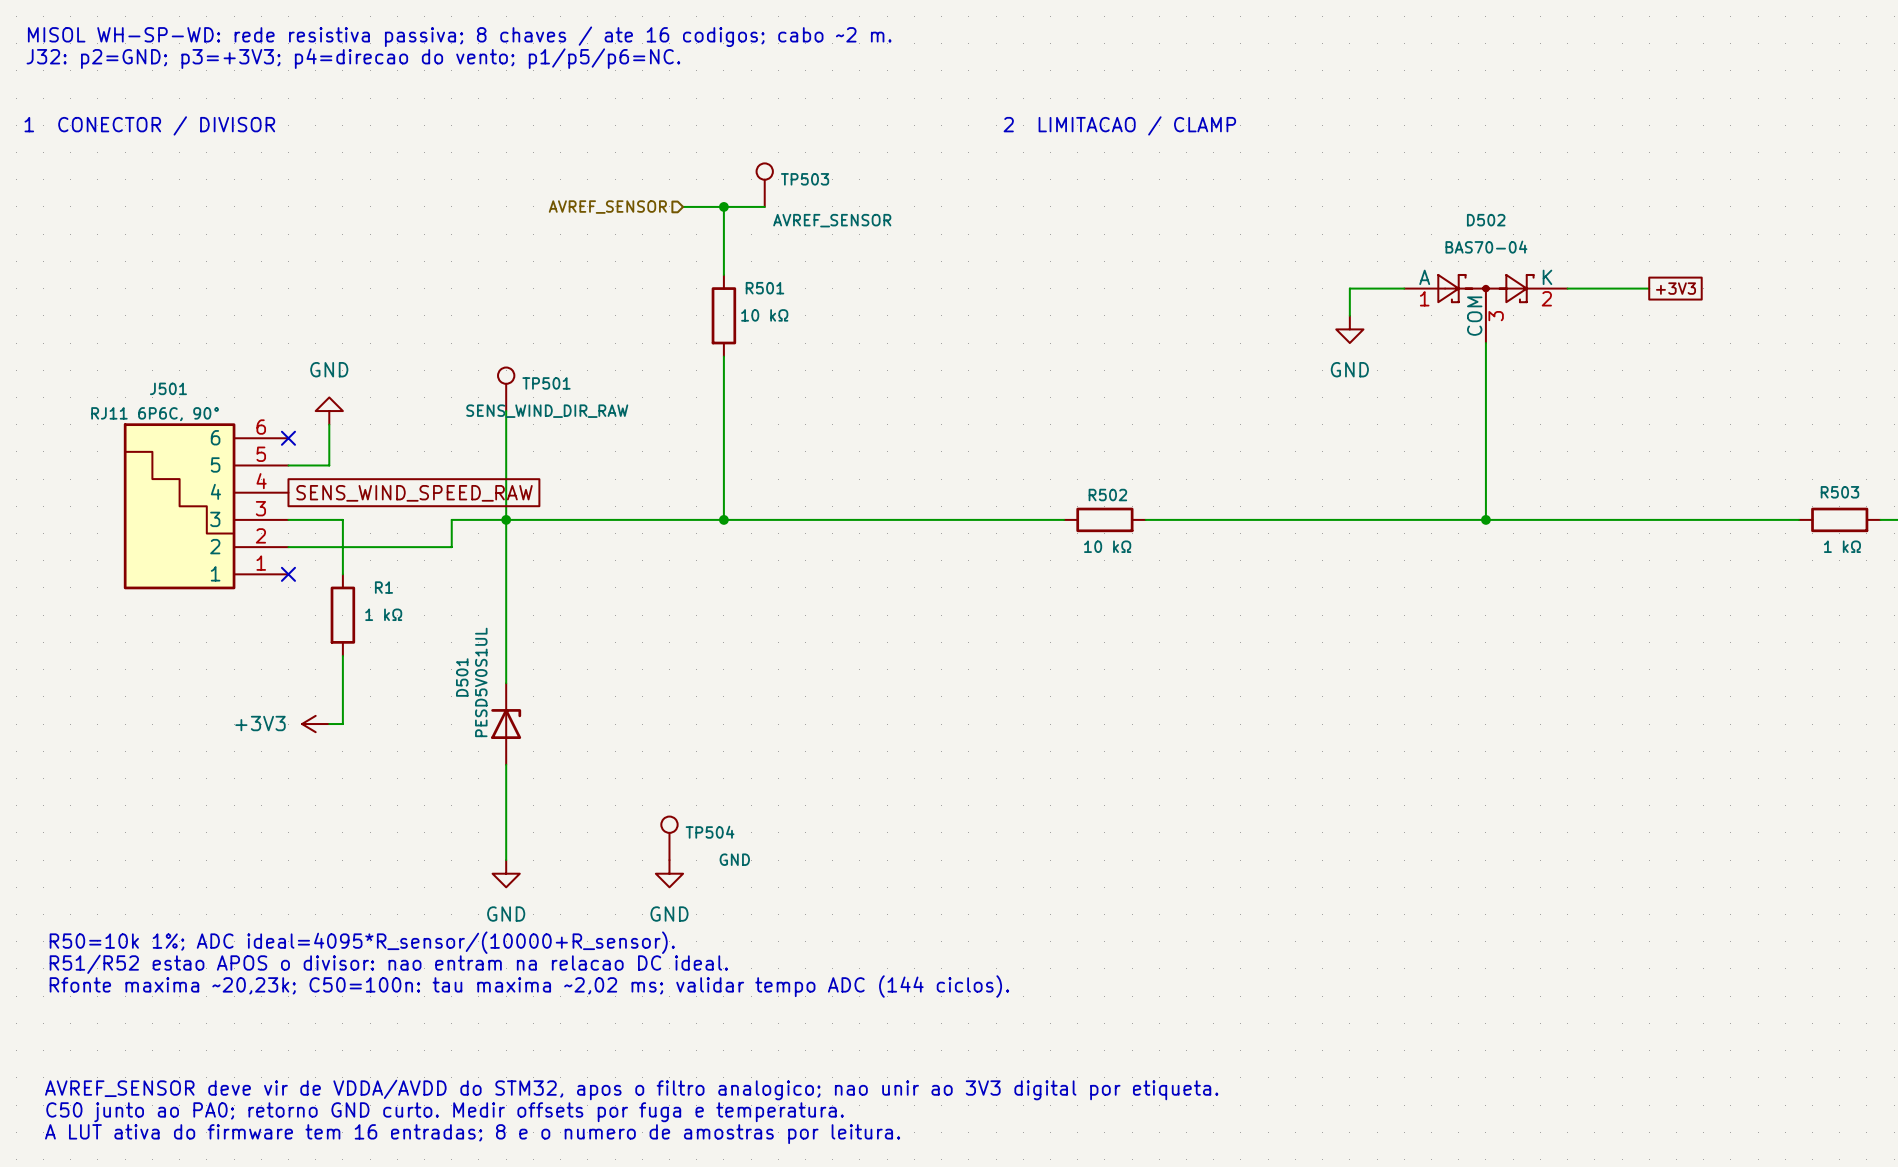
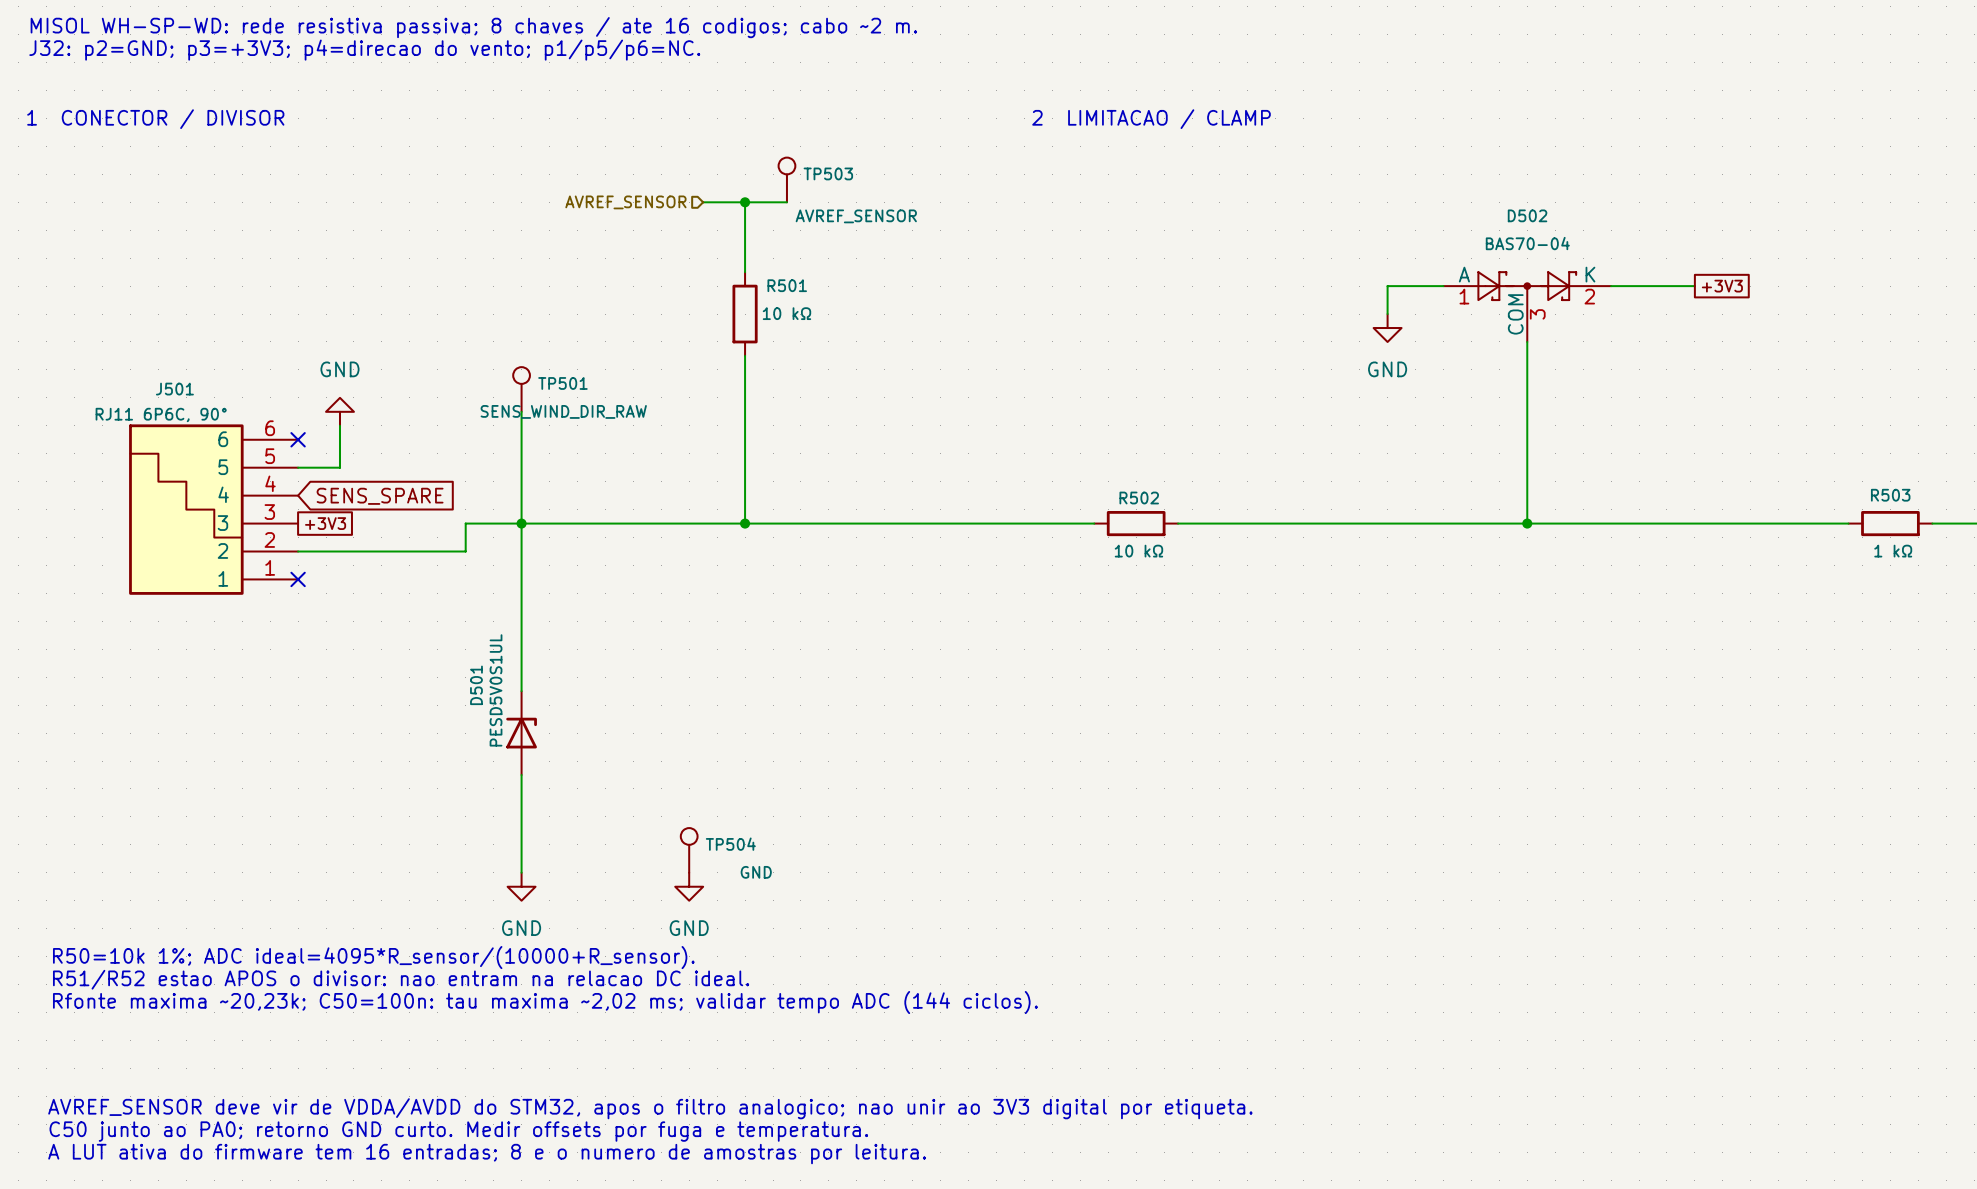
global label shape: passive (414, 493) -> input (380, 496)
global label: SENS_WIND_SPEED_RAW (414, 493) -> SENS_SPARE (380, 496)
wire: (288, 519) (342, 519) (342, 574) -> none
global label: none -> +3V3 (325, 523)
R1: 1 kΩ (342, 615) -> none
wire: (342, 655) (342, 724) (329, 724) -> none
power symbol: +3V3 (315, 724) -> none

